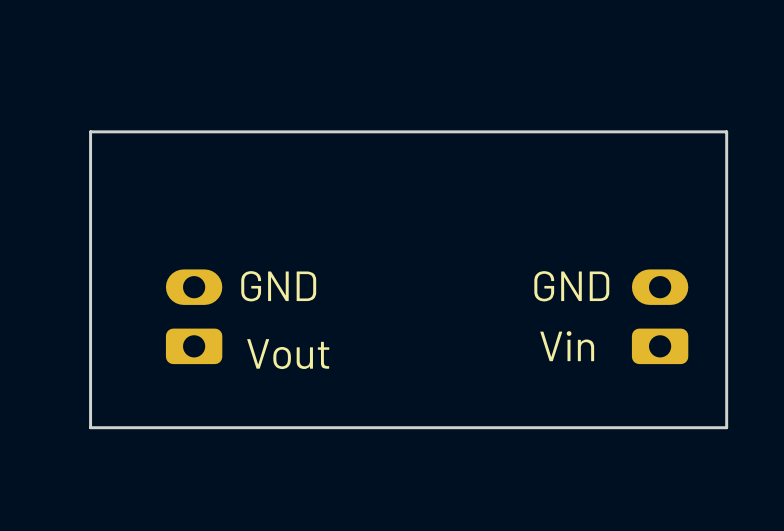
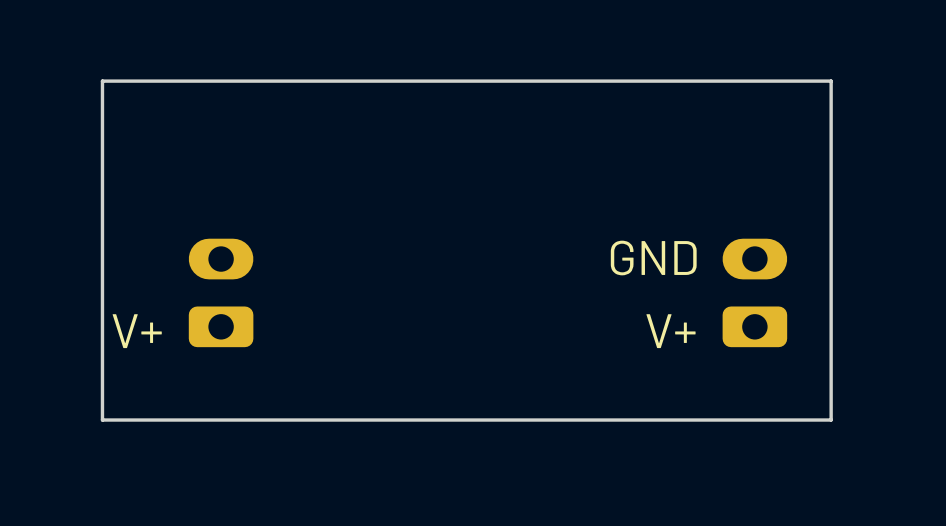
text: GND (278, 286) -> none
text: Vin (567, 346) -> V+ (671, 331)
text: none -> V+ (137, 331)
text: Vout (288, 354) -> none

